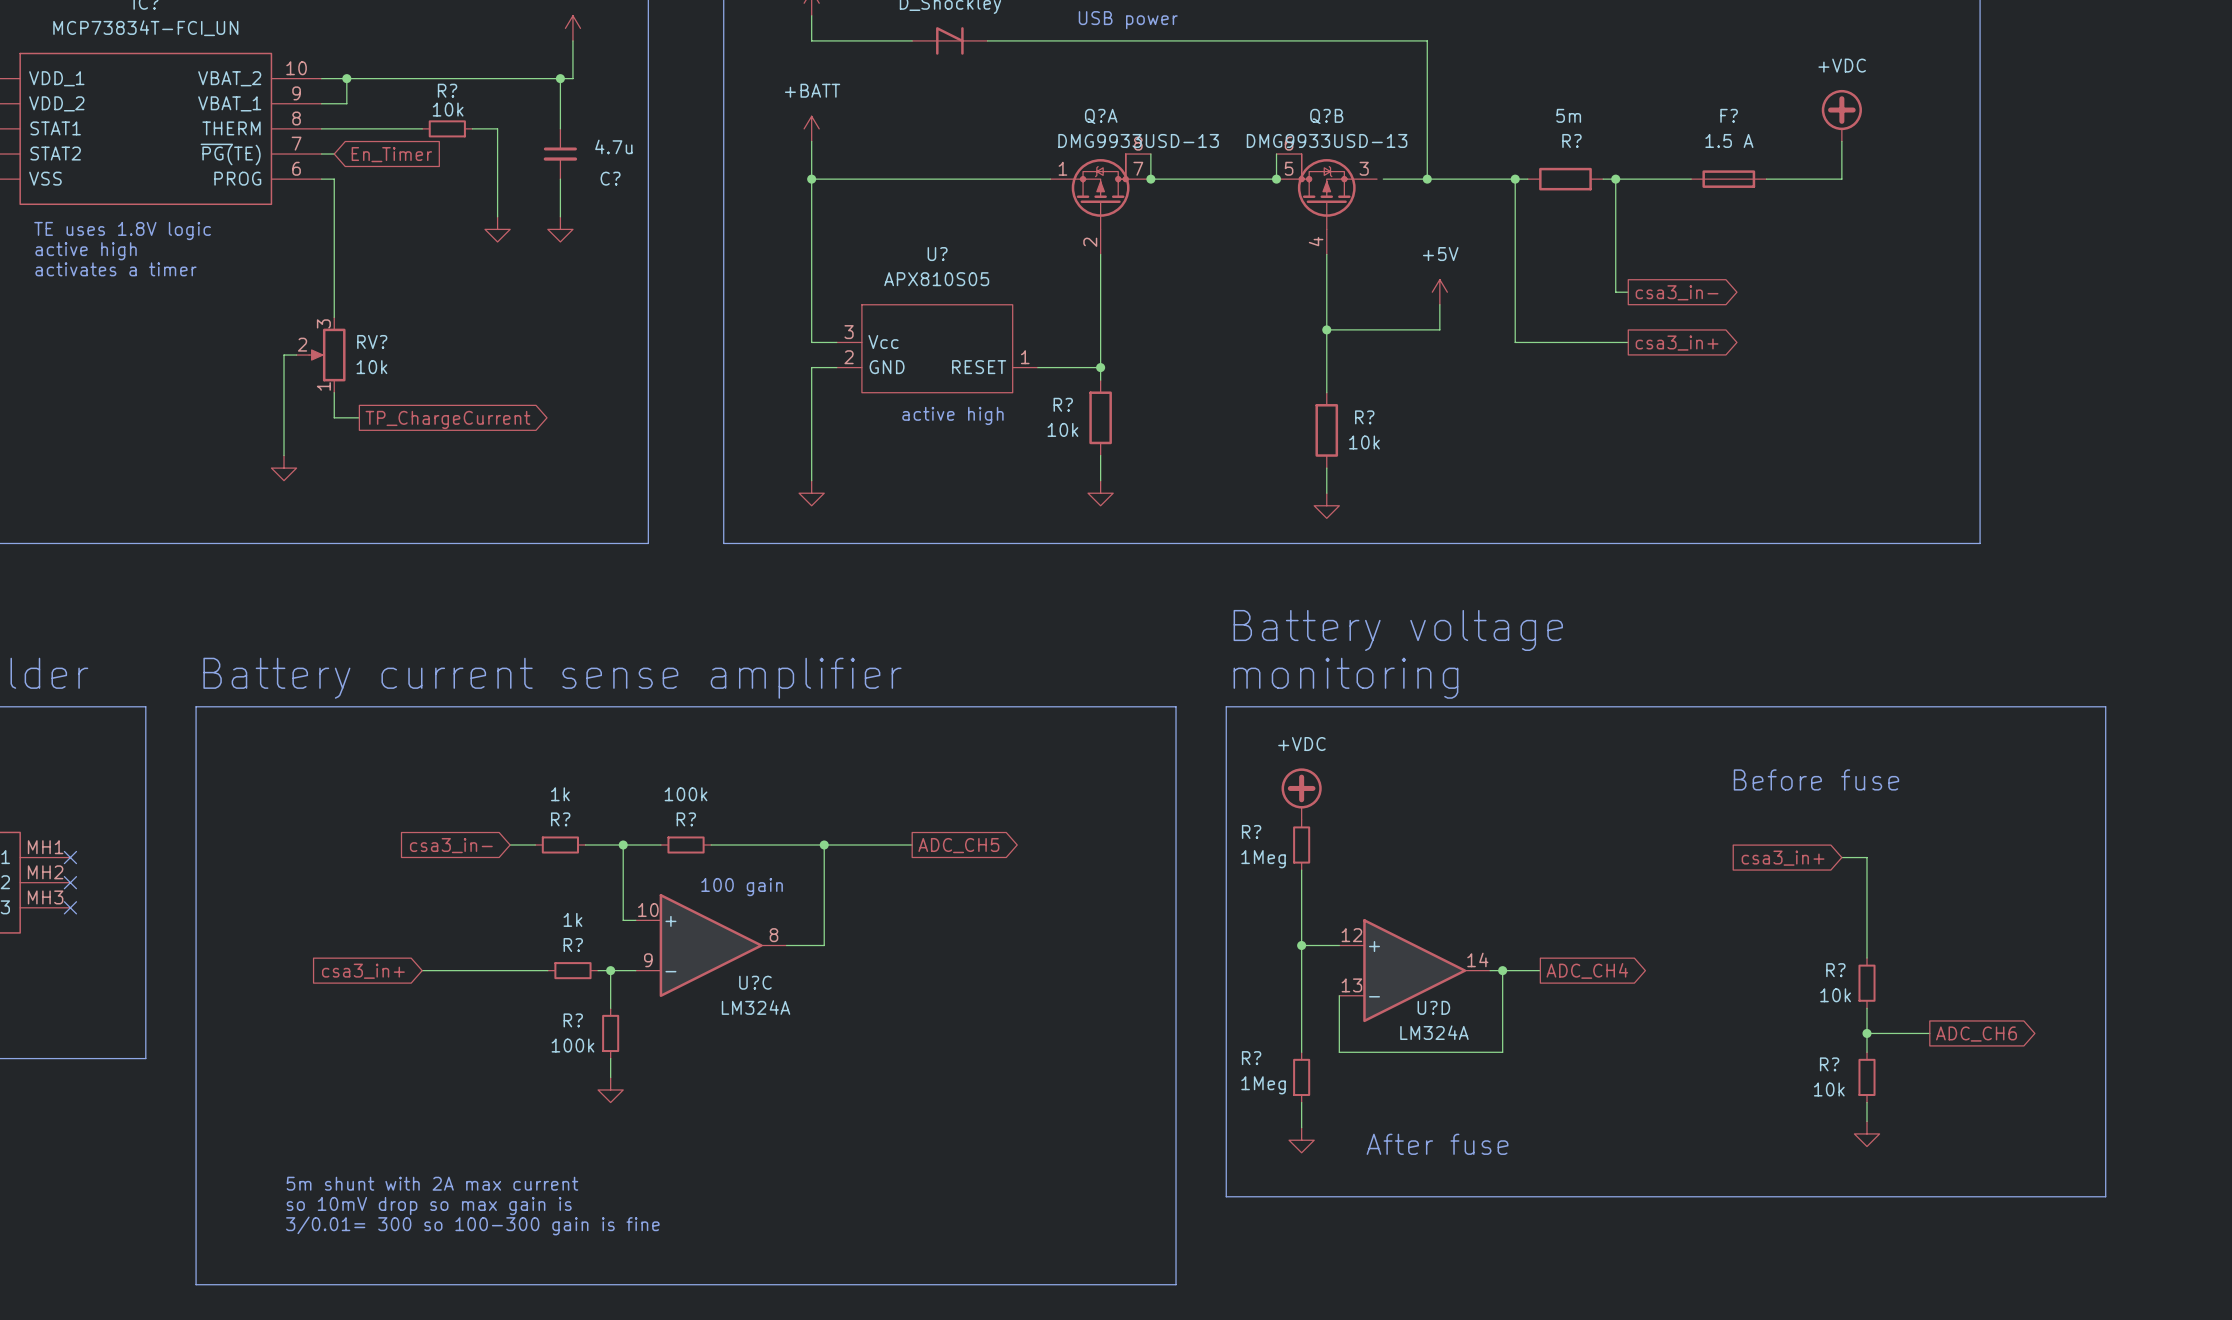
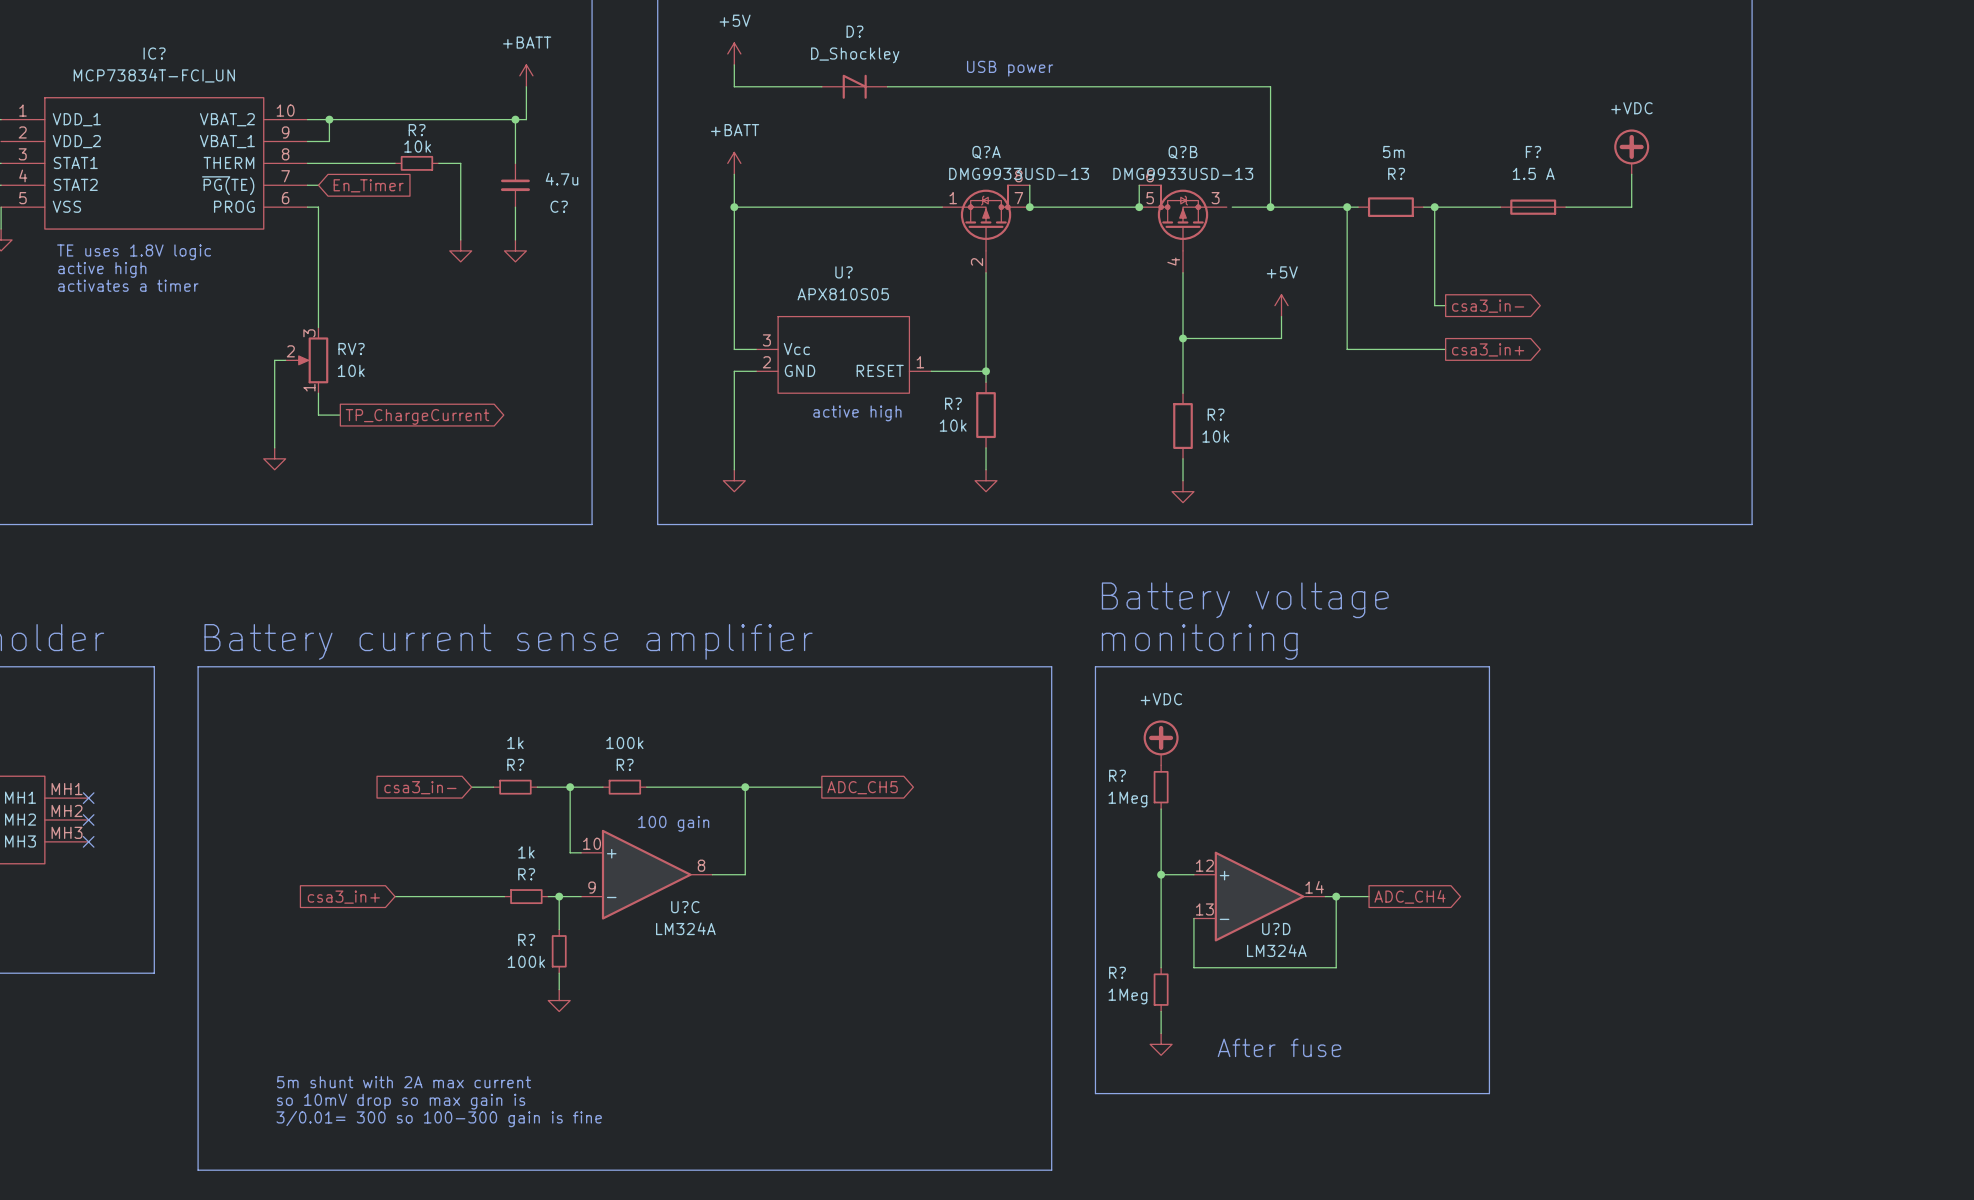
line: (1678, 706) (2105, 706) (2105, 1196) (1678, 1196) -> (1489, 666) (1489, 1093)
text: Before fuse (1816, 779) -> none
wire: (1841, 857) (1866, 857) (1866, 958) -> none
global label: csa3_in+ (1783, 858) -> none
R?: 10k (1866, 983) -> none
wire: (1866, 1008) (1866, 1052) -> none
wire: (1866, 1033) (1929, 1033) -> none
junction: (1866, 1033) -> none
global label: ADC_CH6 (1976, 1034) -> none
R?: 10k (1866, 1077) -> none
wire: (1866, 1102) (1866, 1121) -> none
power symbol: (1866, 1133) -> none

